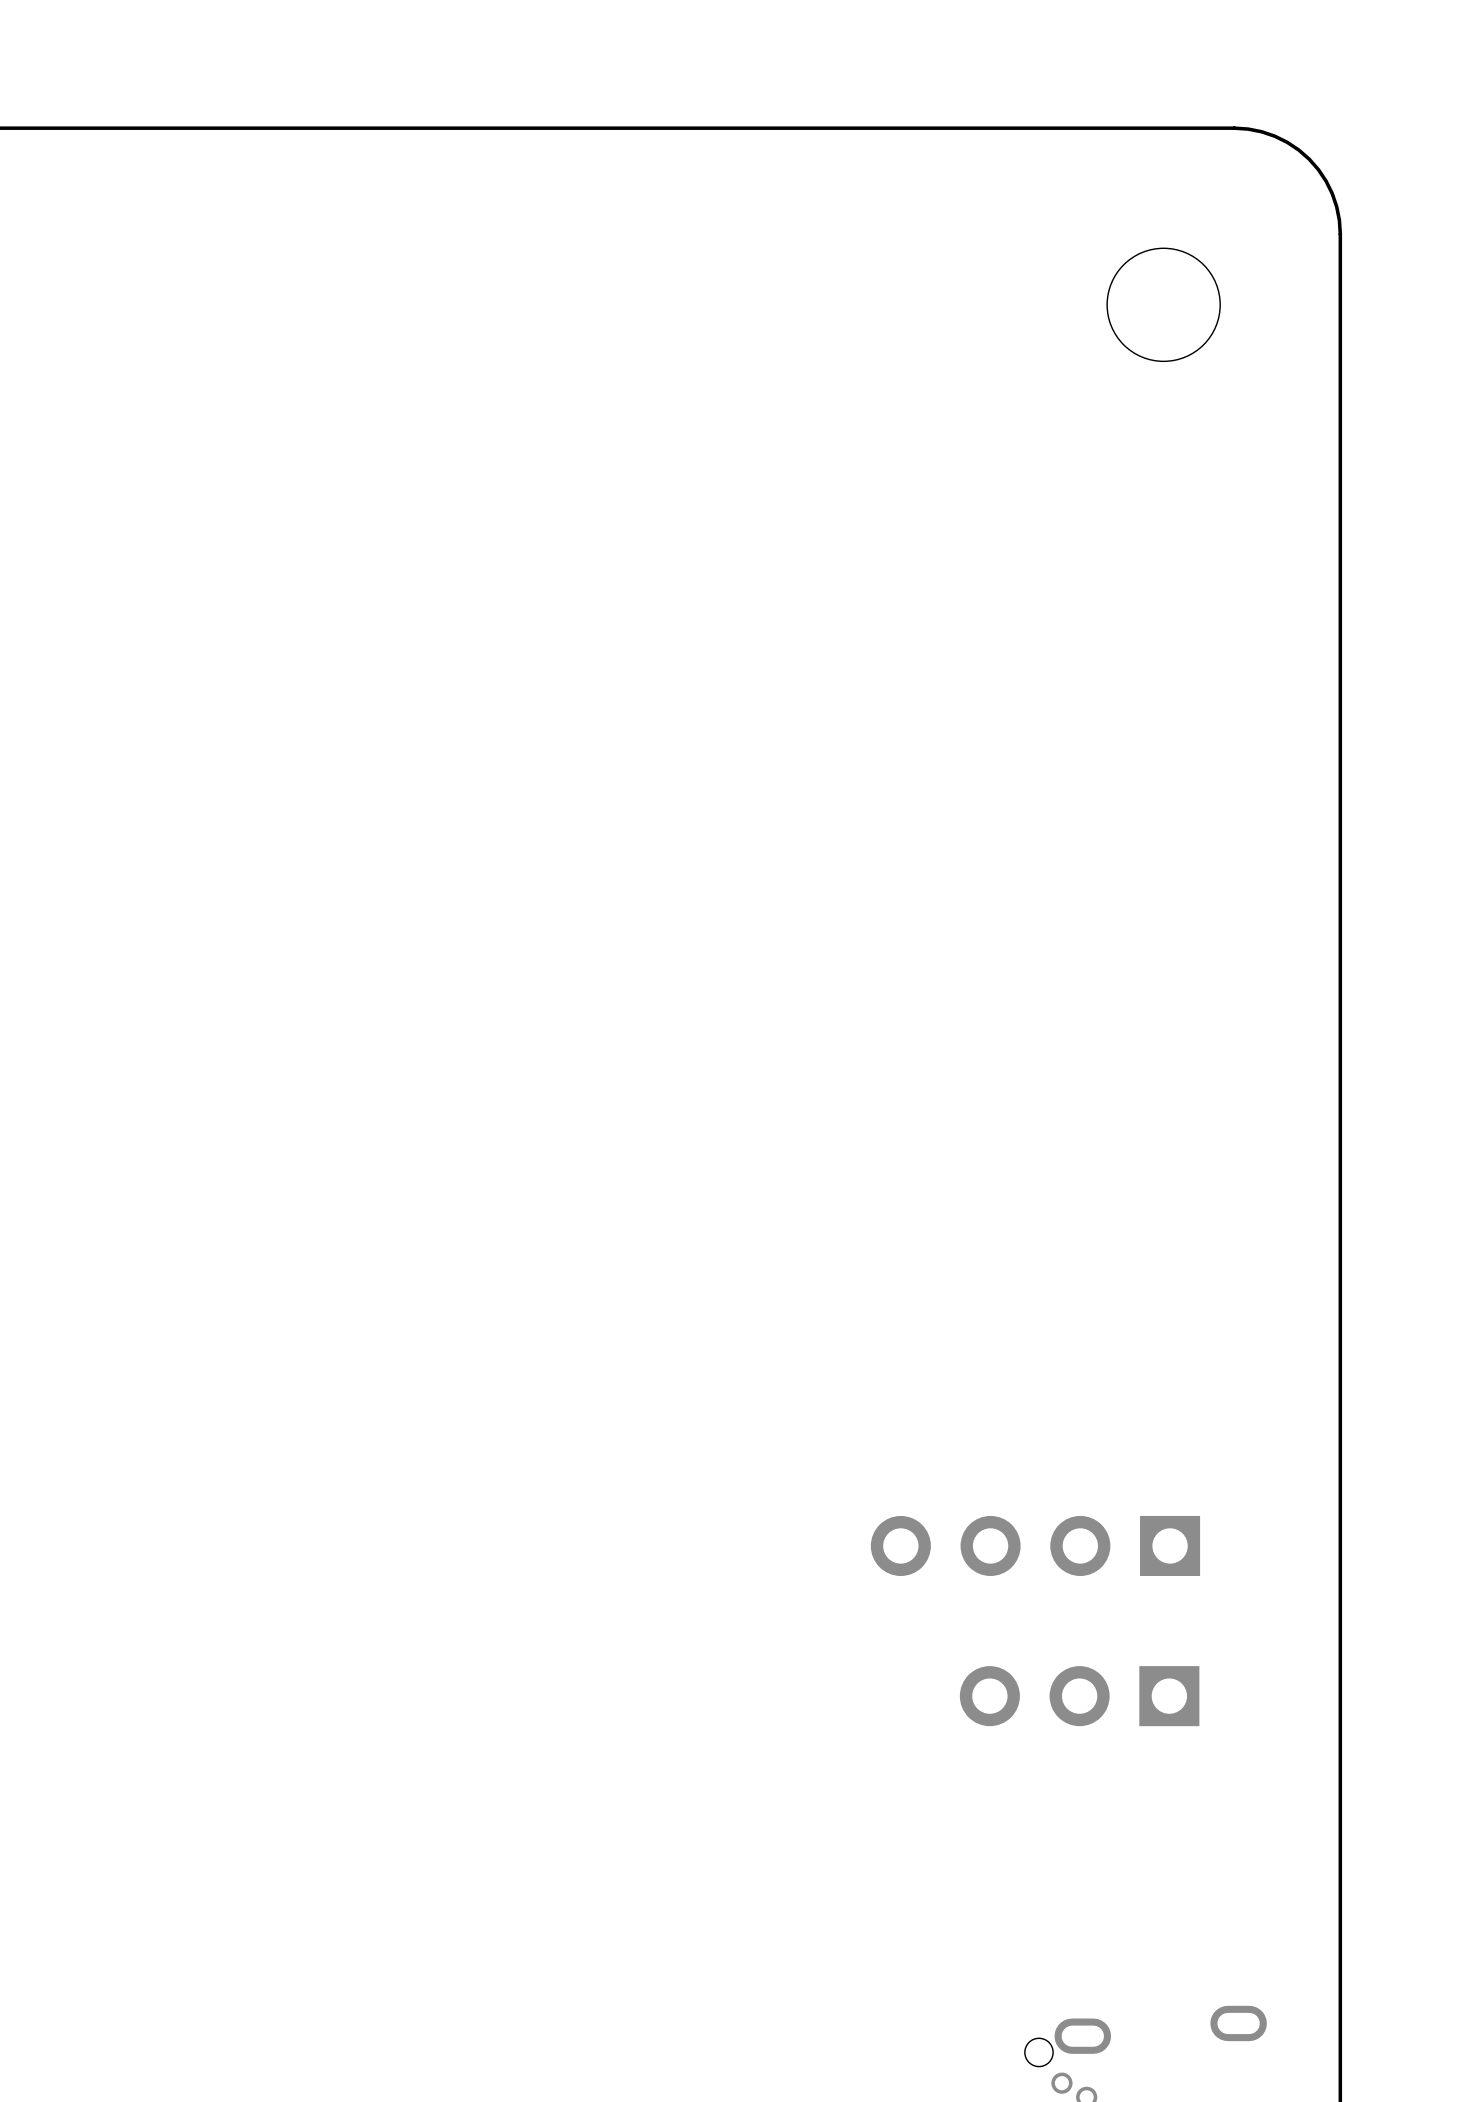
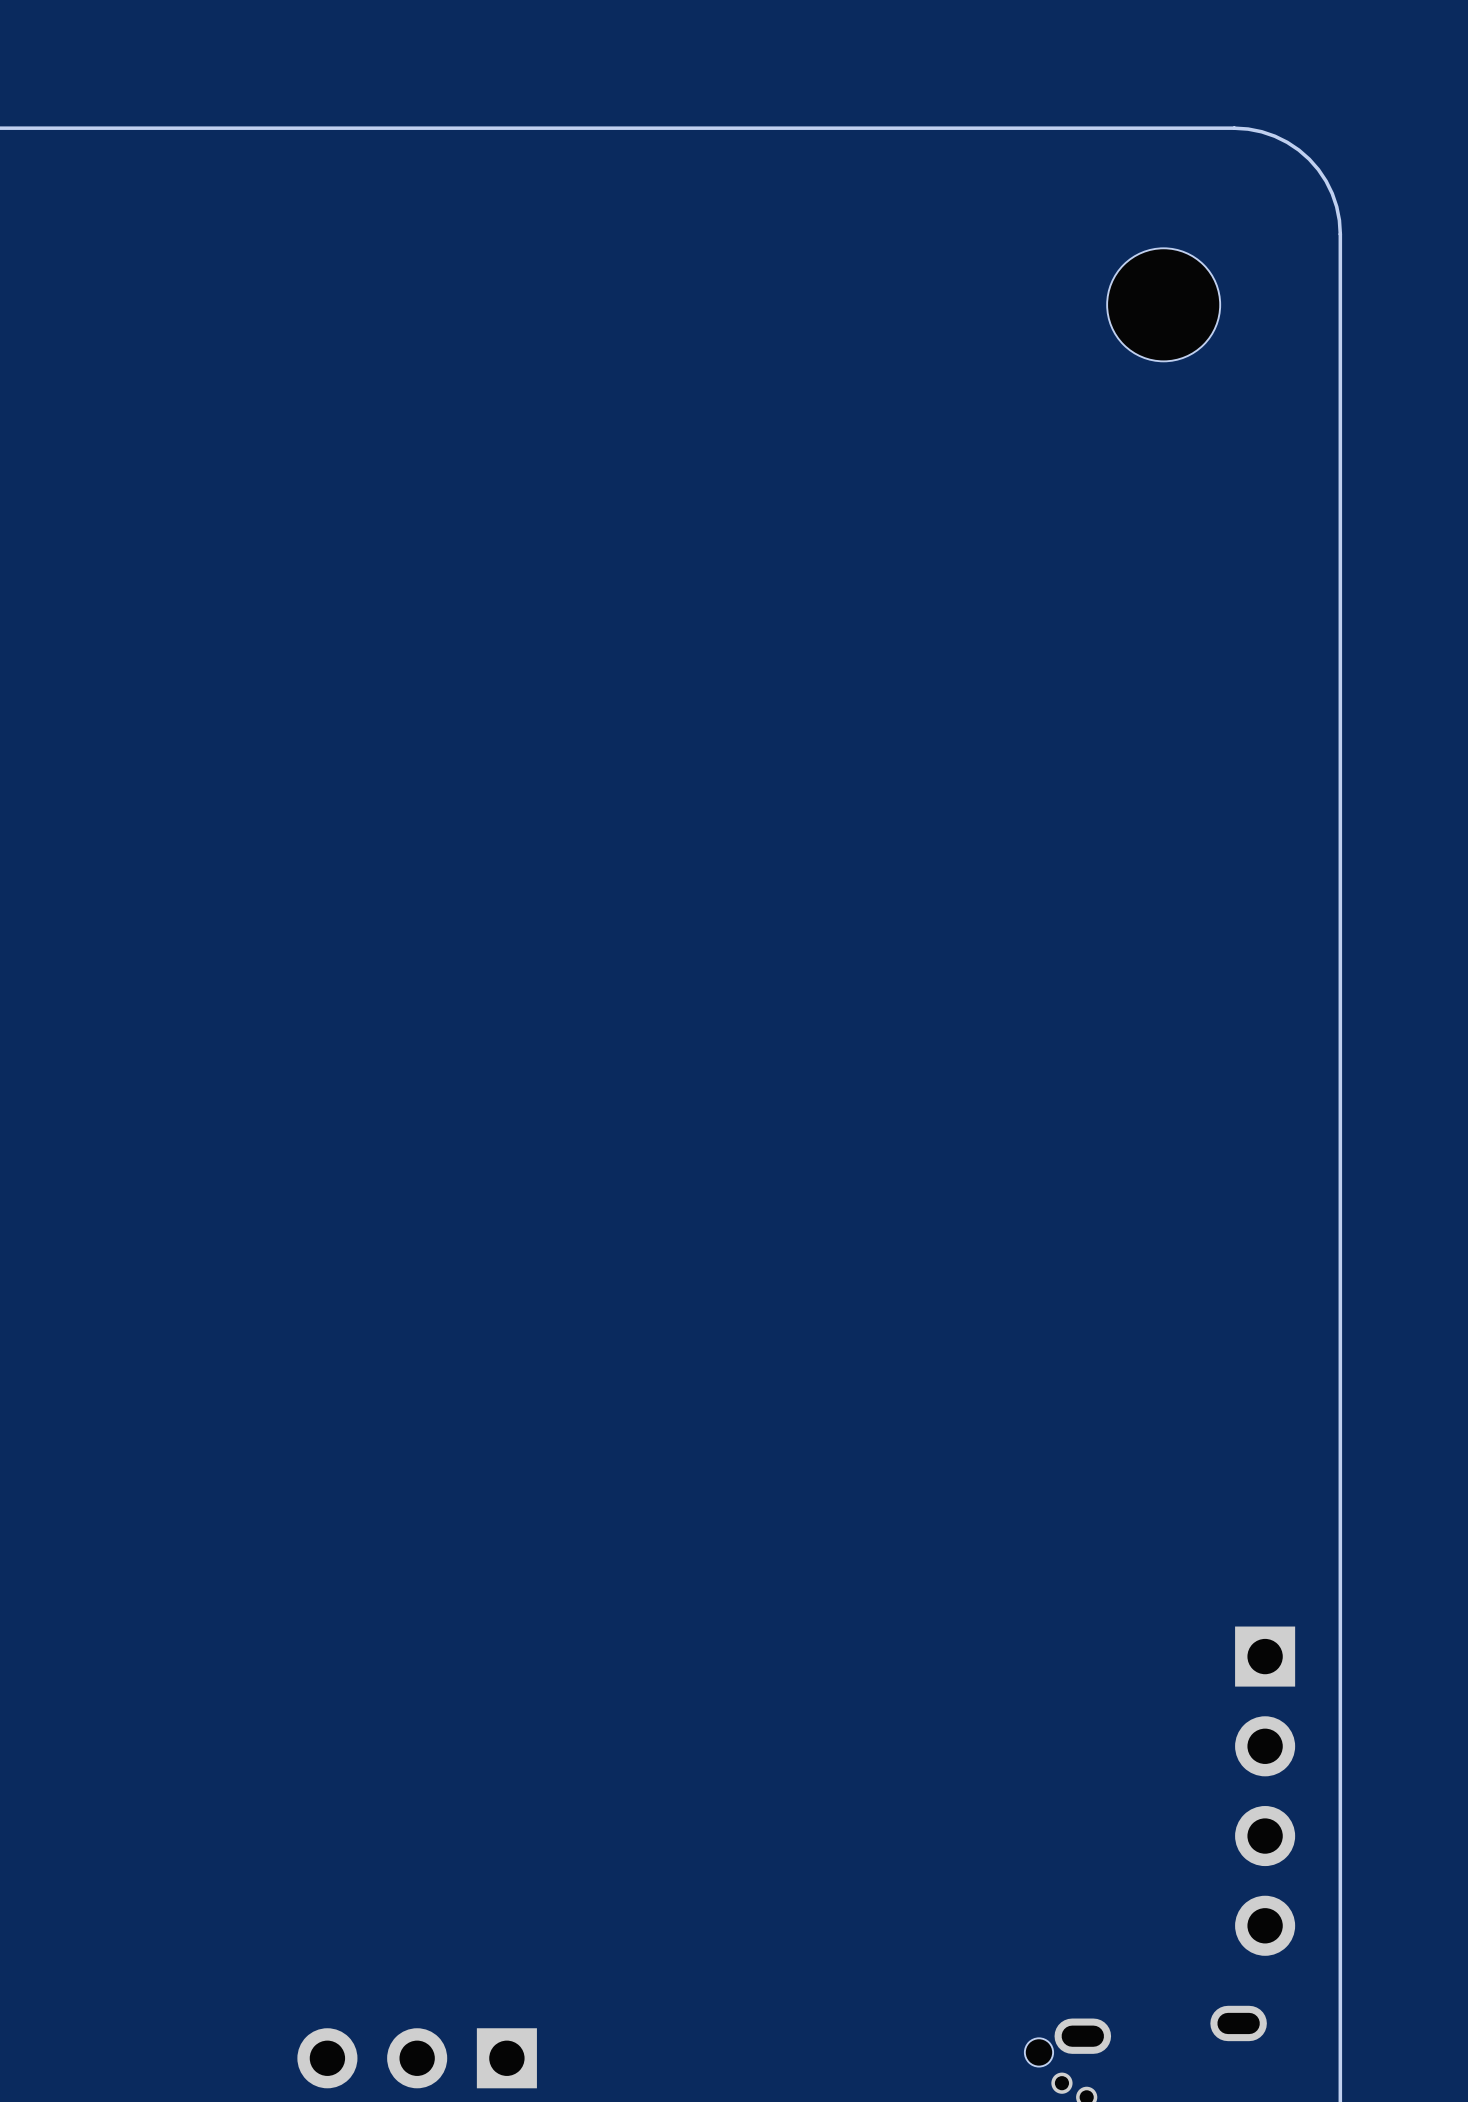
part rotation: 0° (1035, 1545) -> 90° counterclockwise (1265, 1791)
part position: (1035, 1545) -> (1265, 1791)
part position: (1079, 1696) -> (417, 2058)

